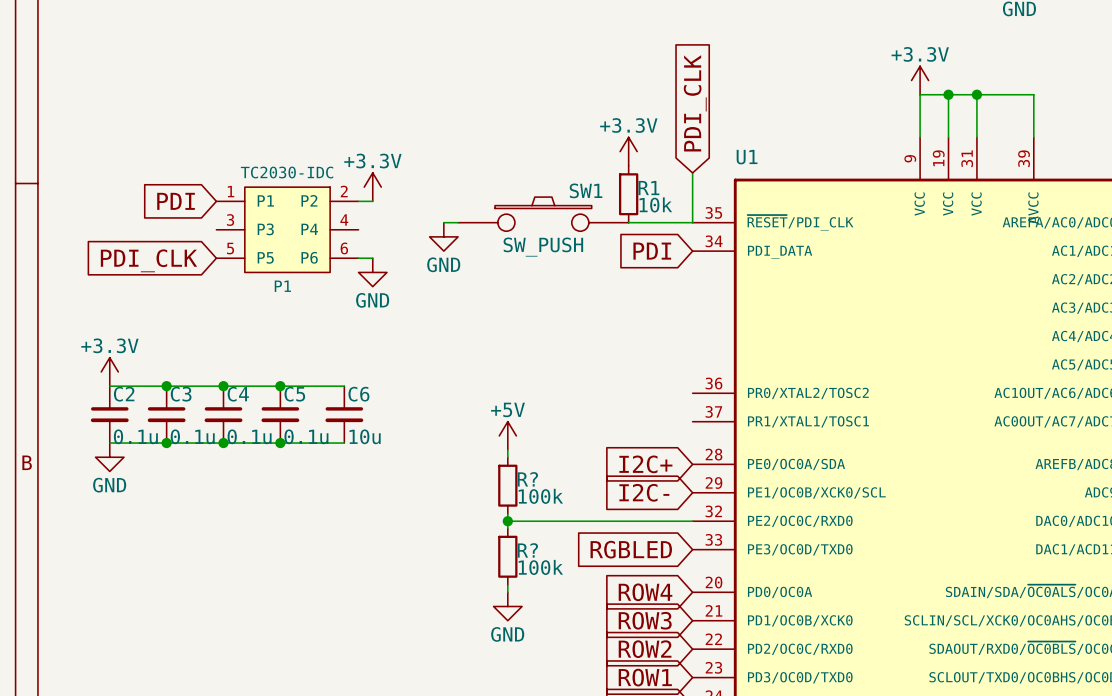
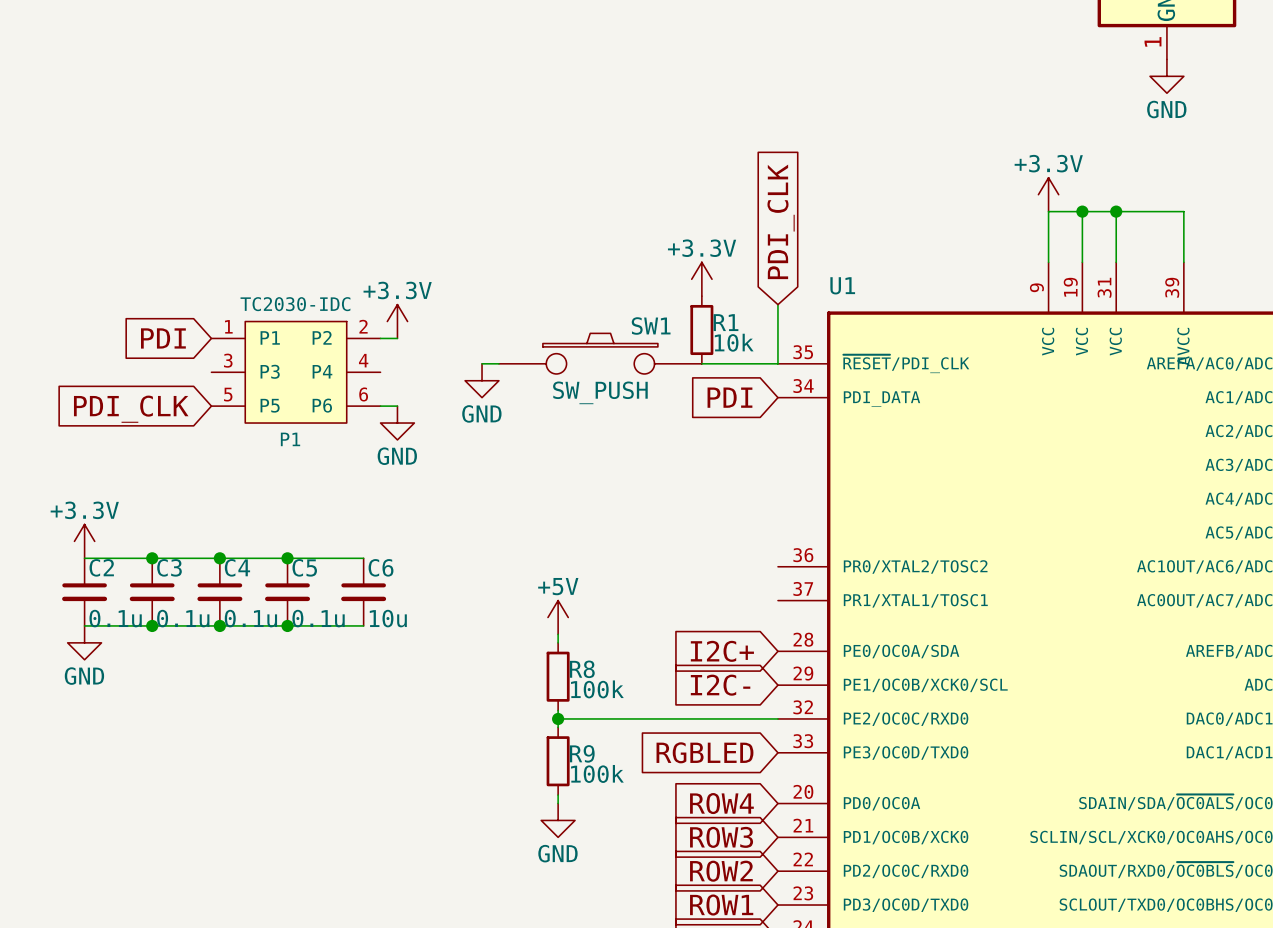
R? name: R? (527, 479) -> R8 (582, 669)
R? name: R? (527, 550) -> R9 (582, 753)

